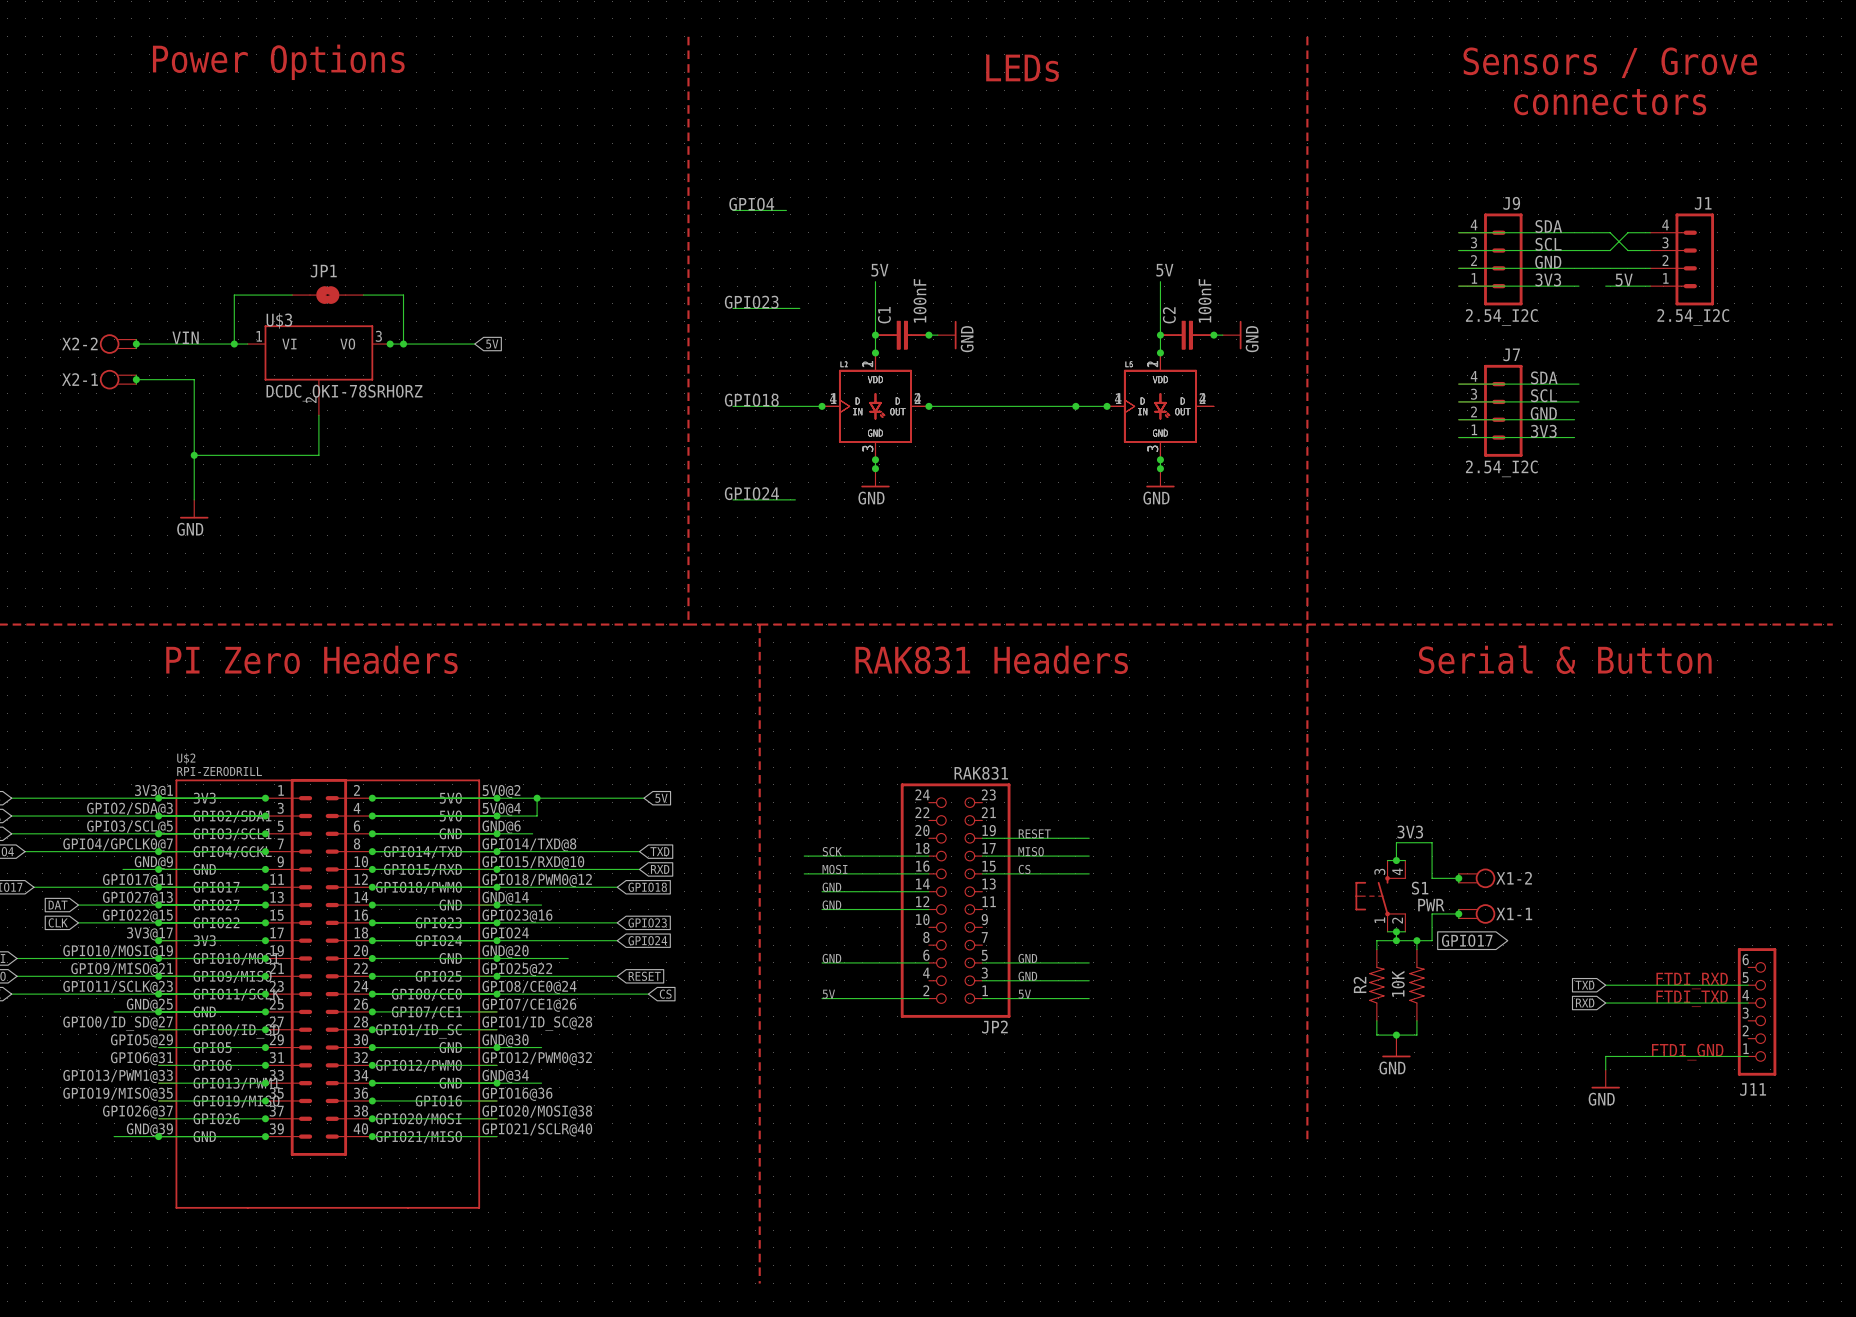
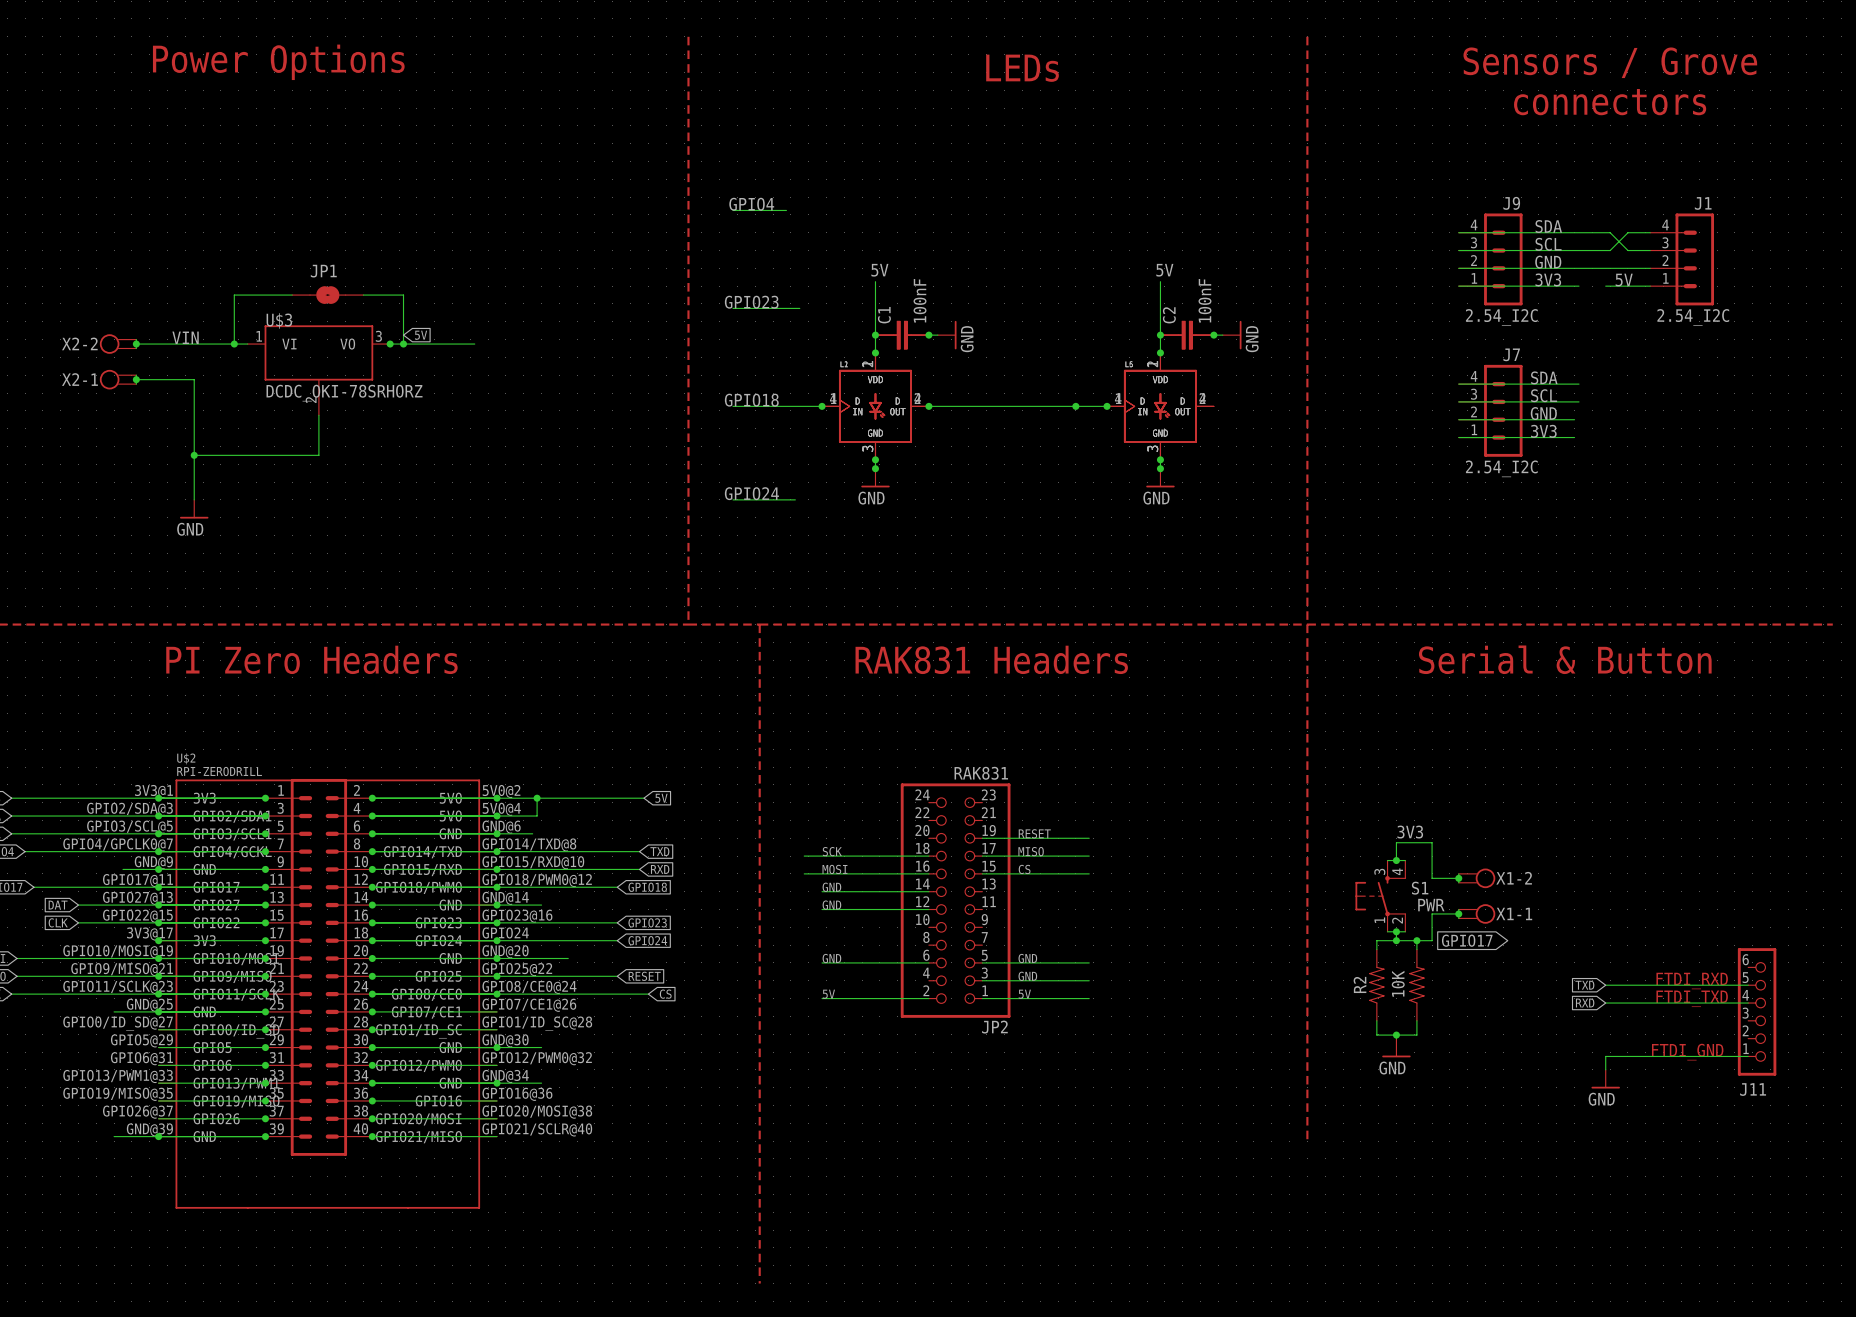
global label position: 5V (492, 344) -> 5V (421, 335)

